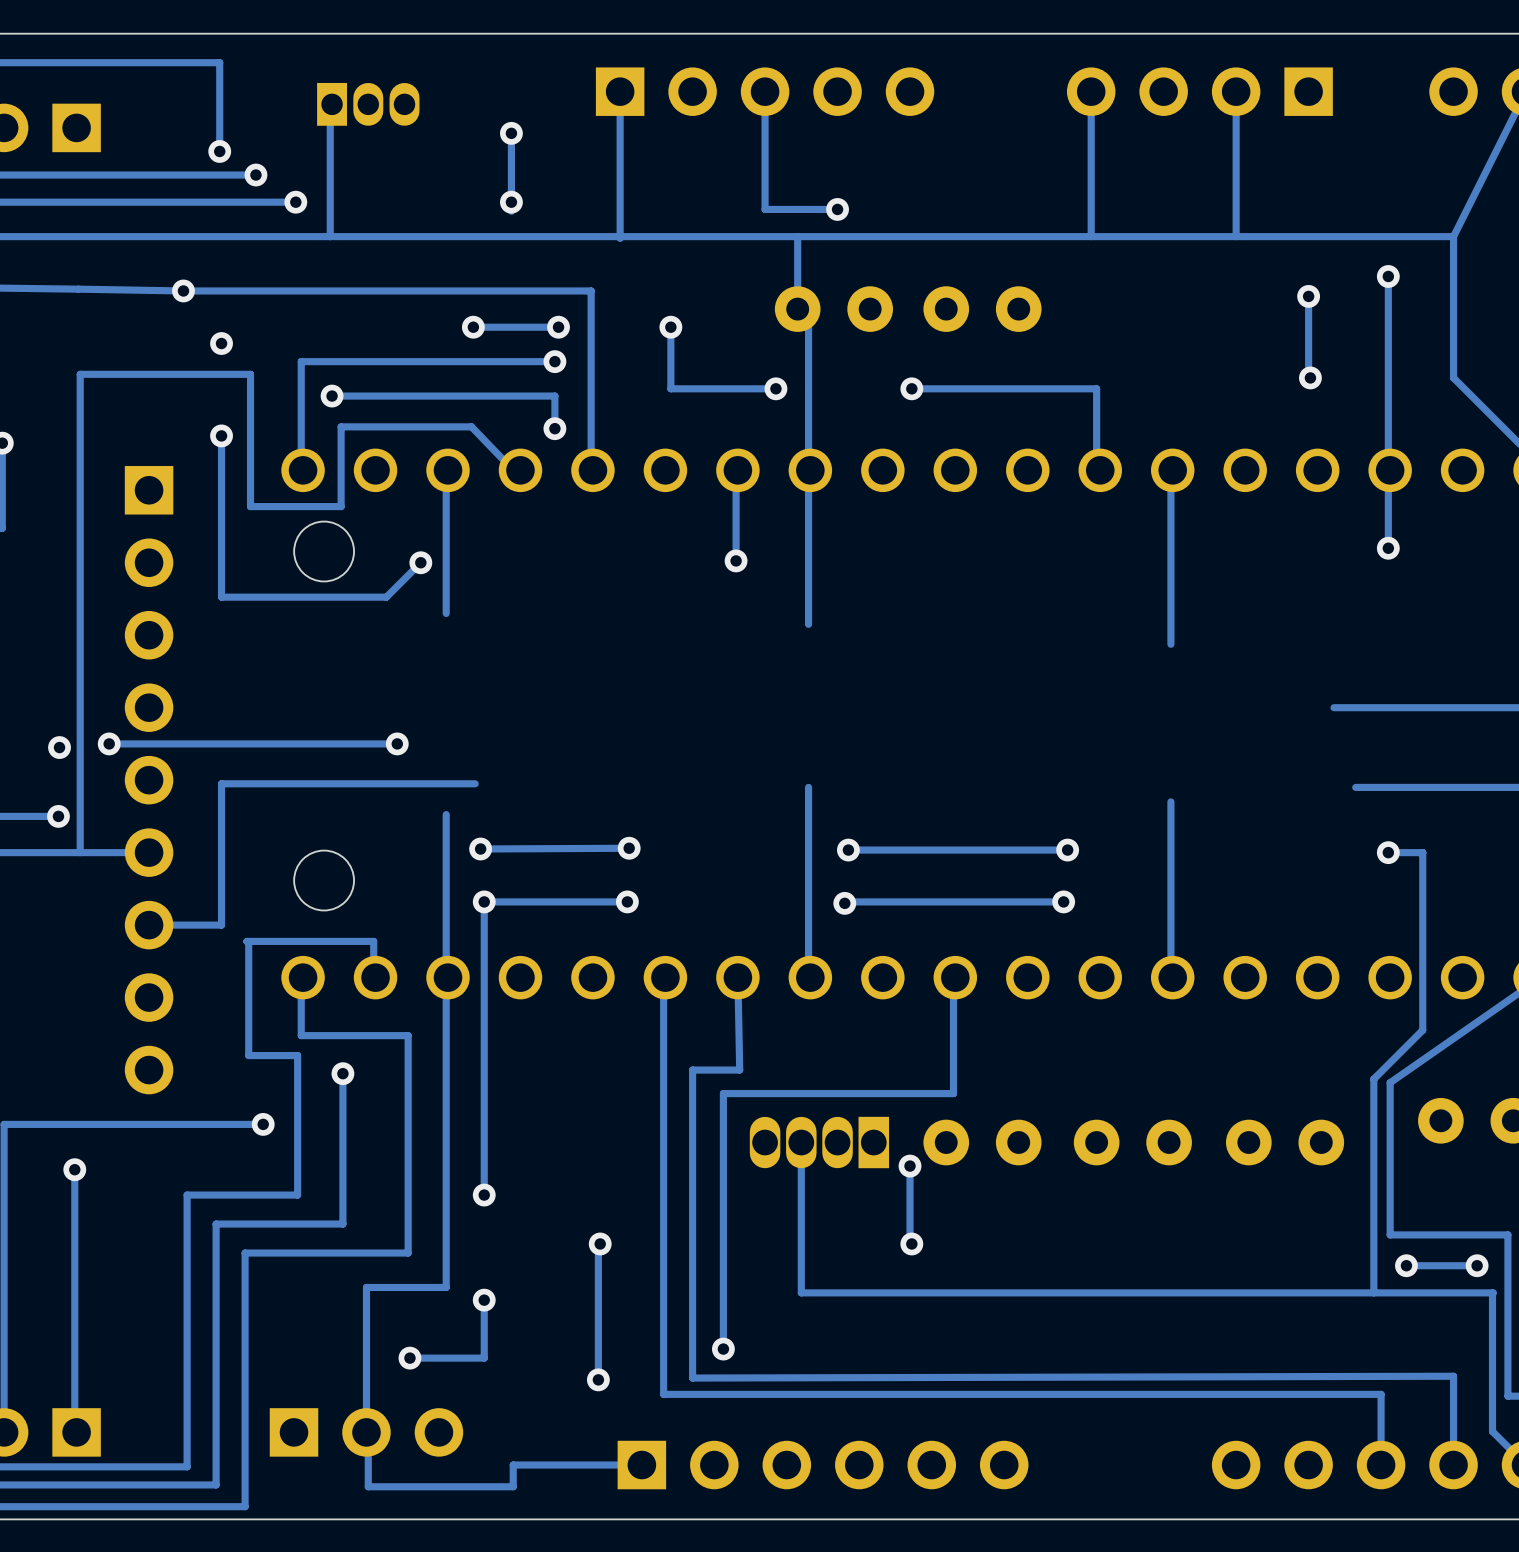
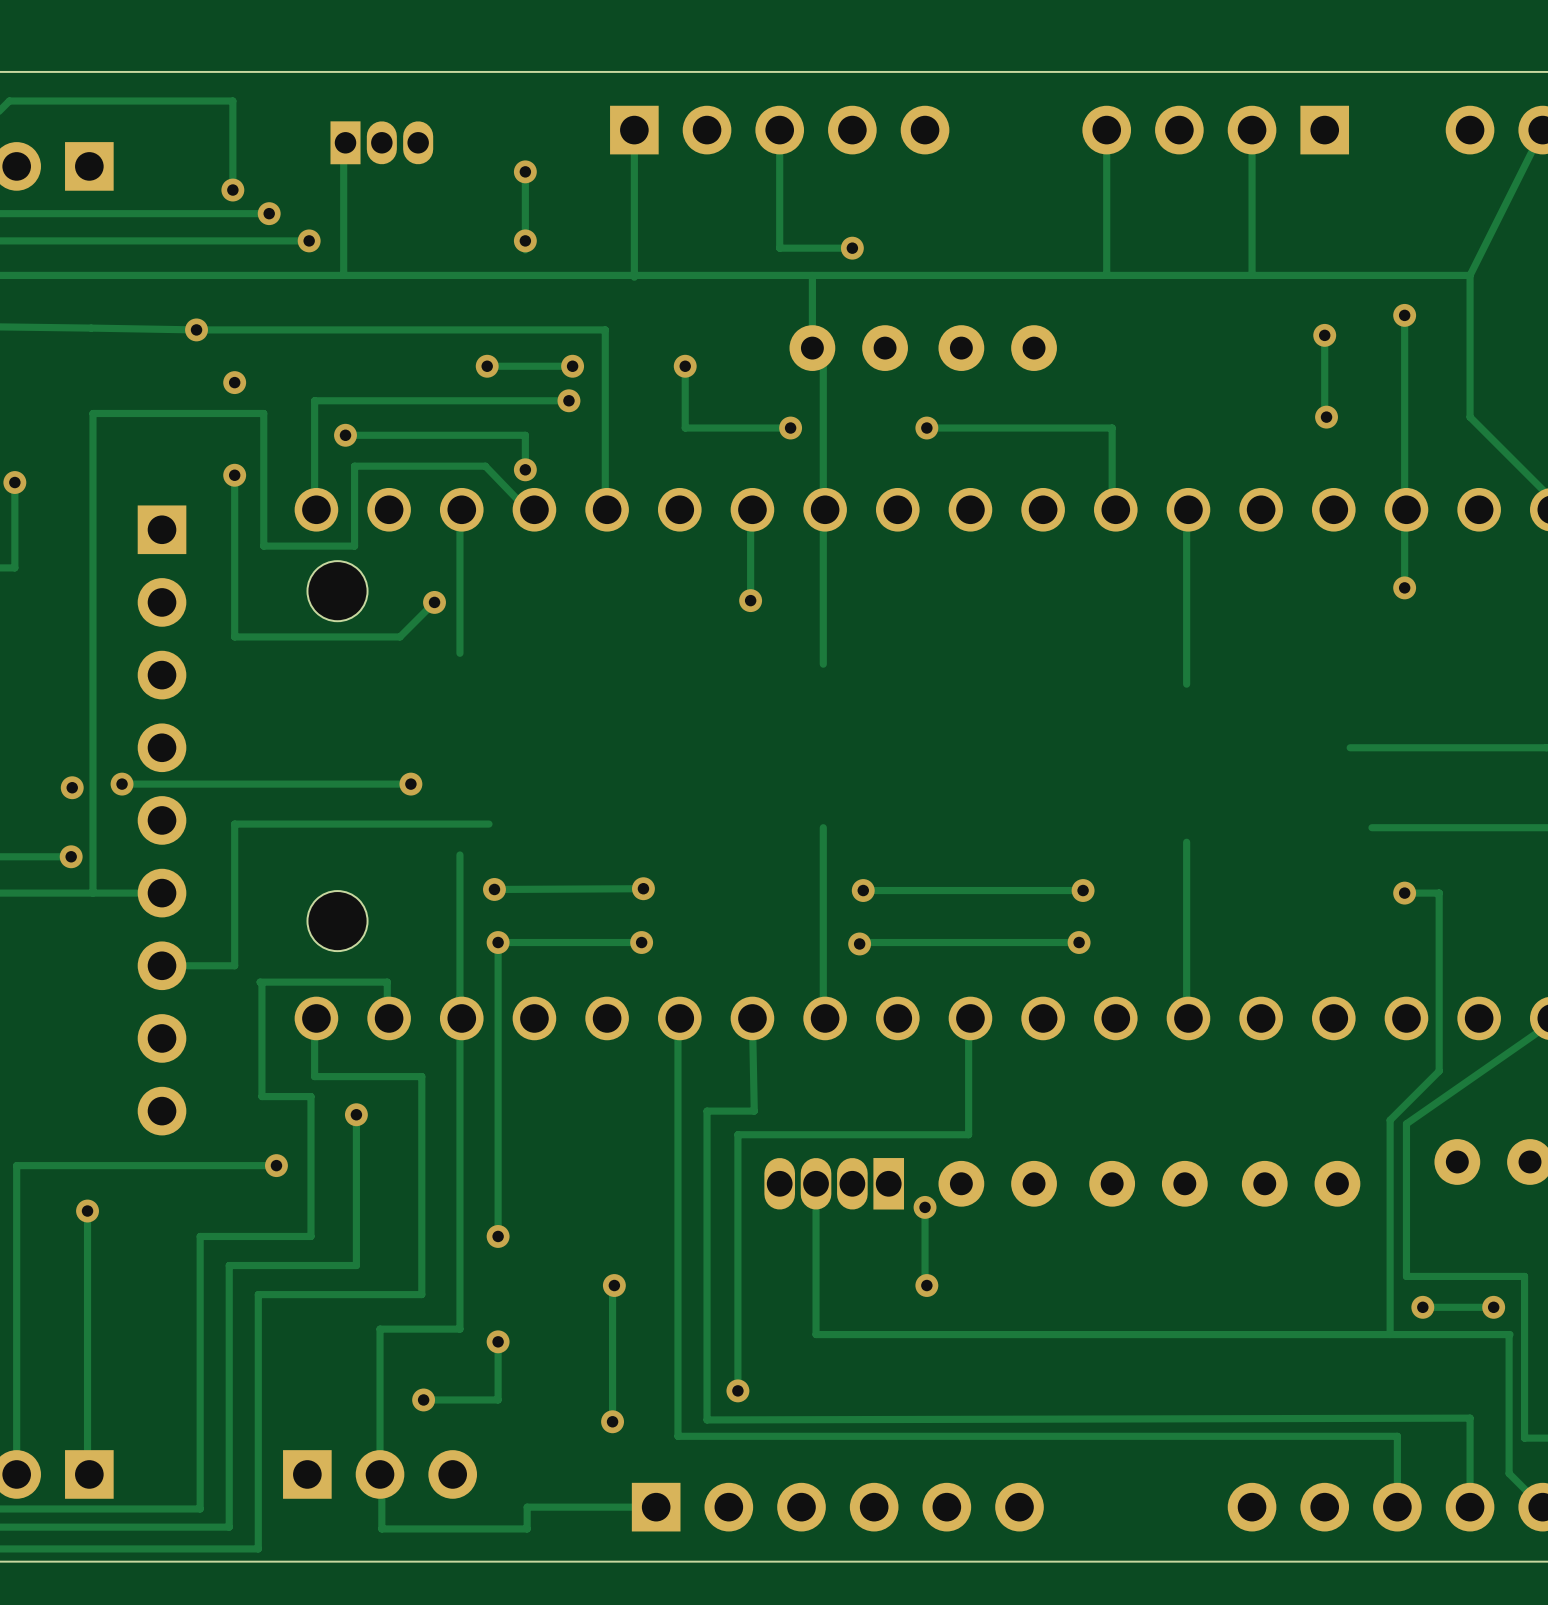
track: (511, 396) (554, 396) (554, 428) -> (525, 435) (525, 469)
via position: (554, 428) -> (525, 469)

